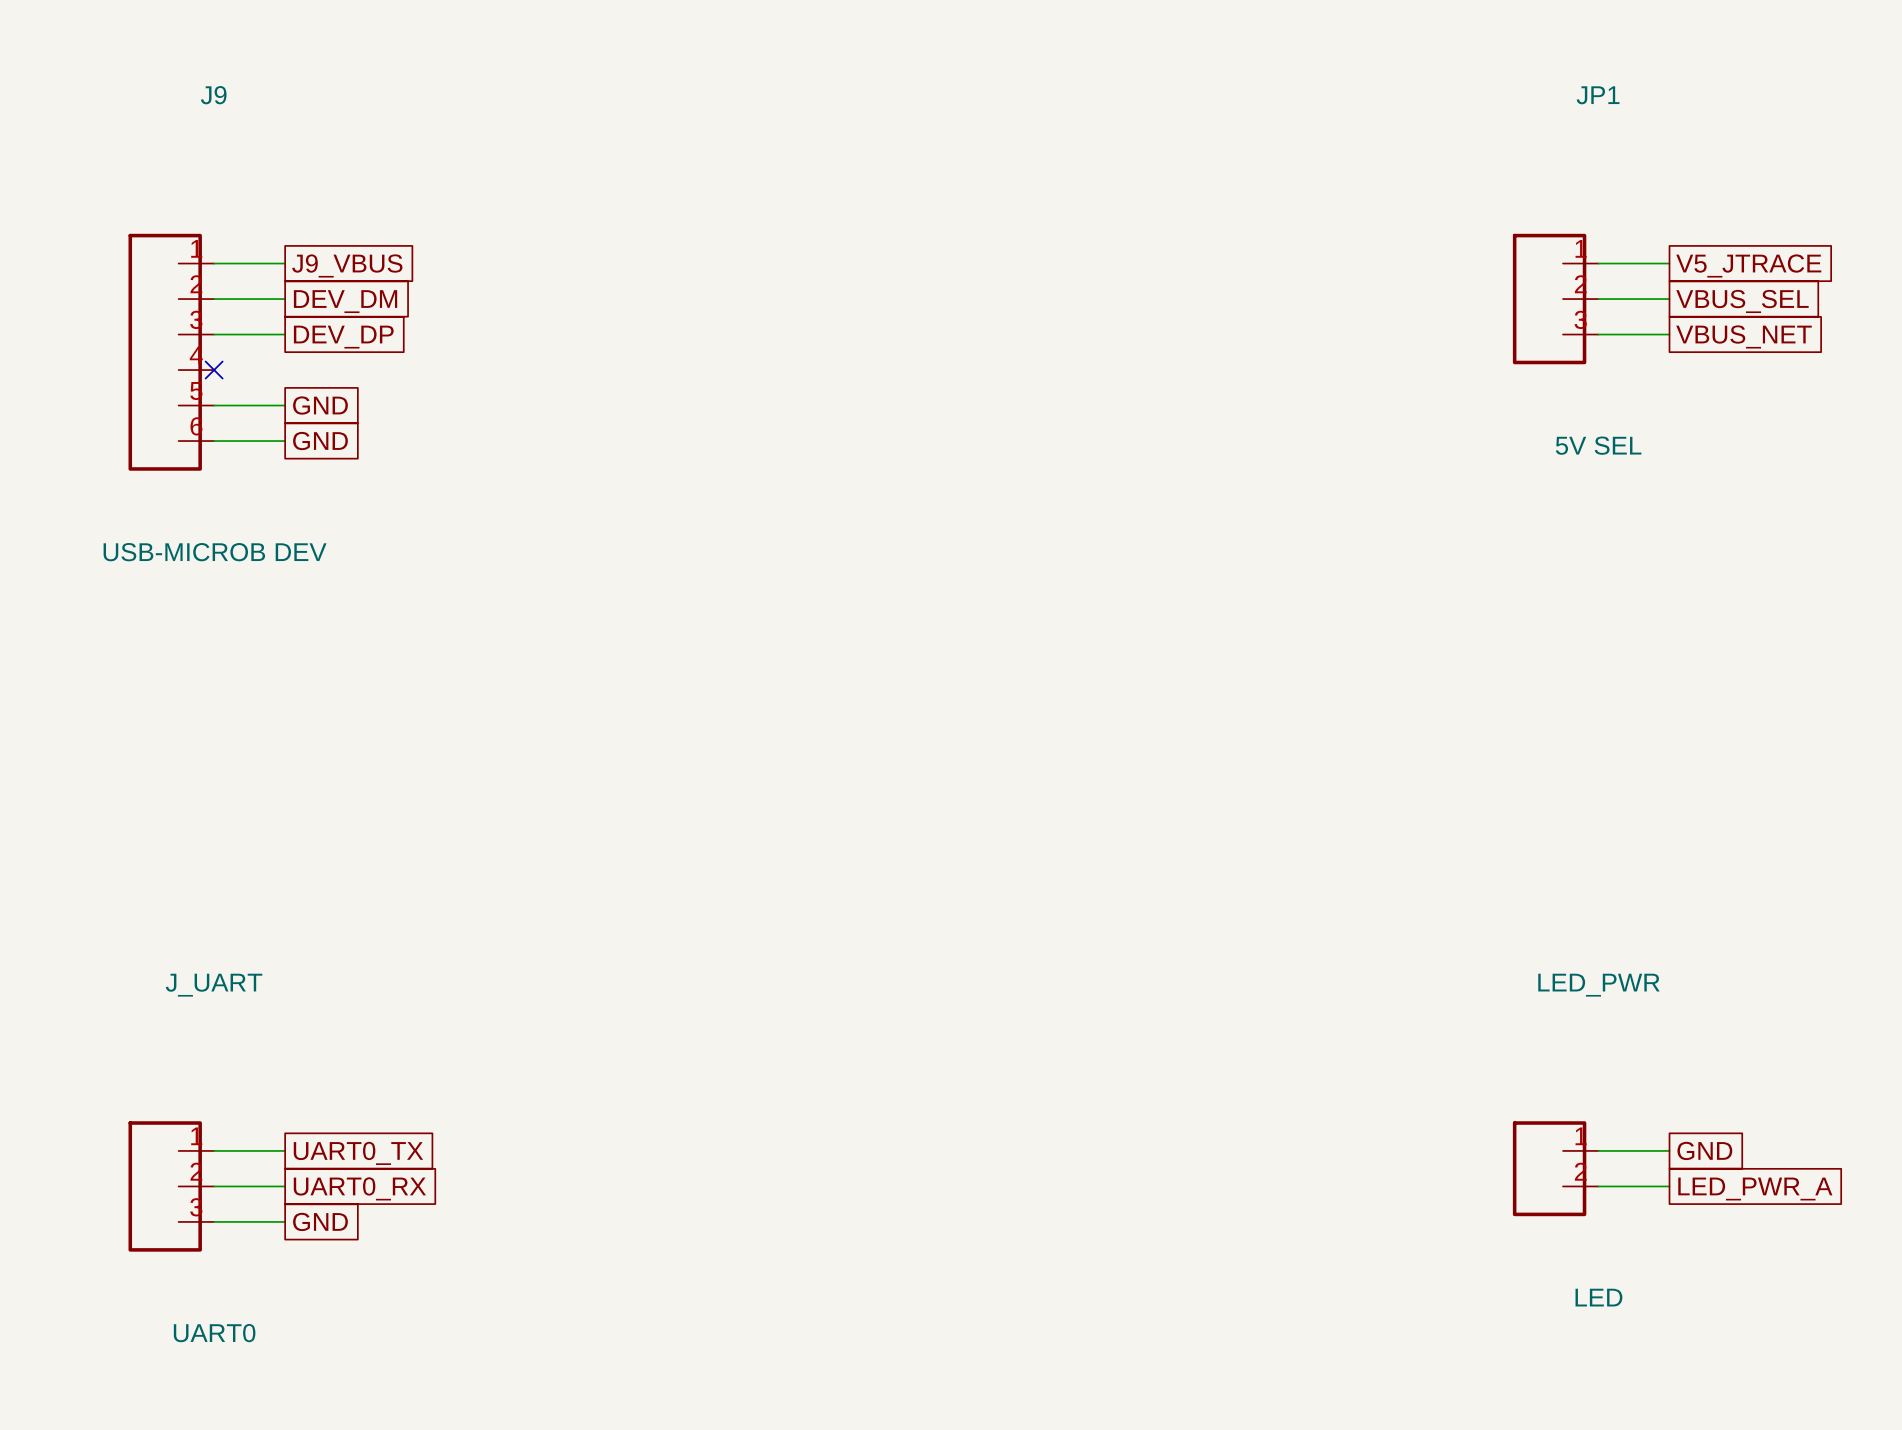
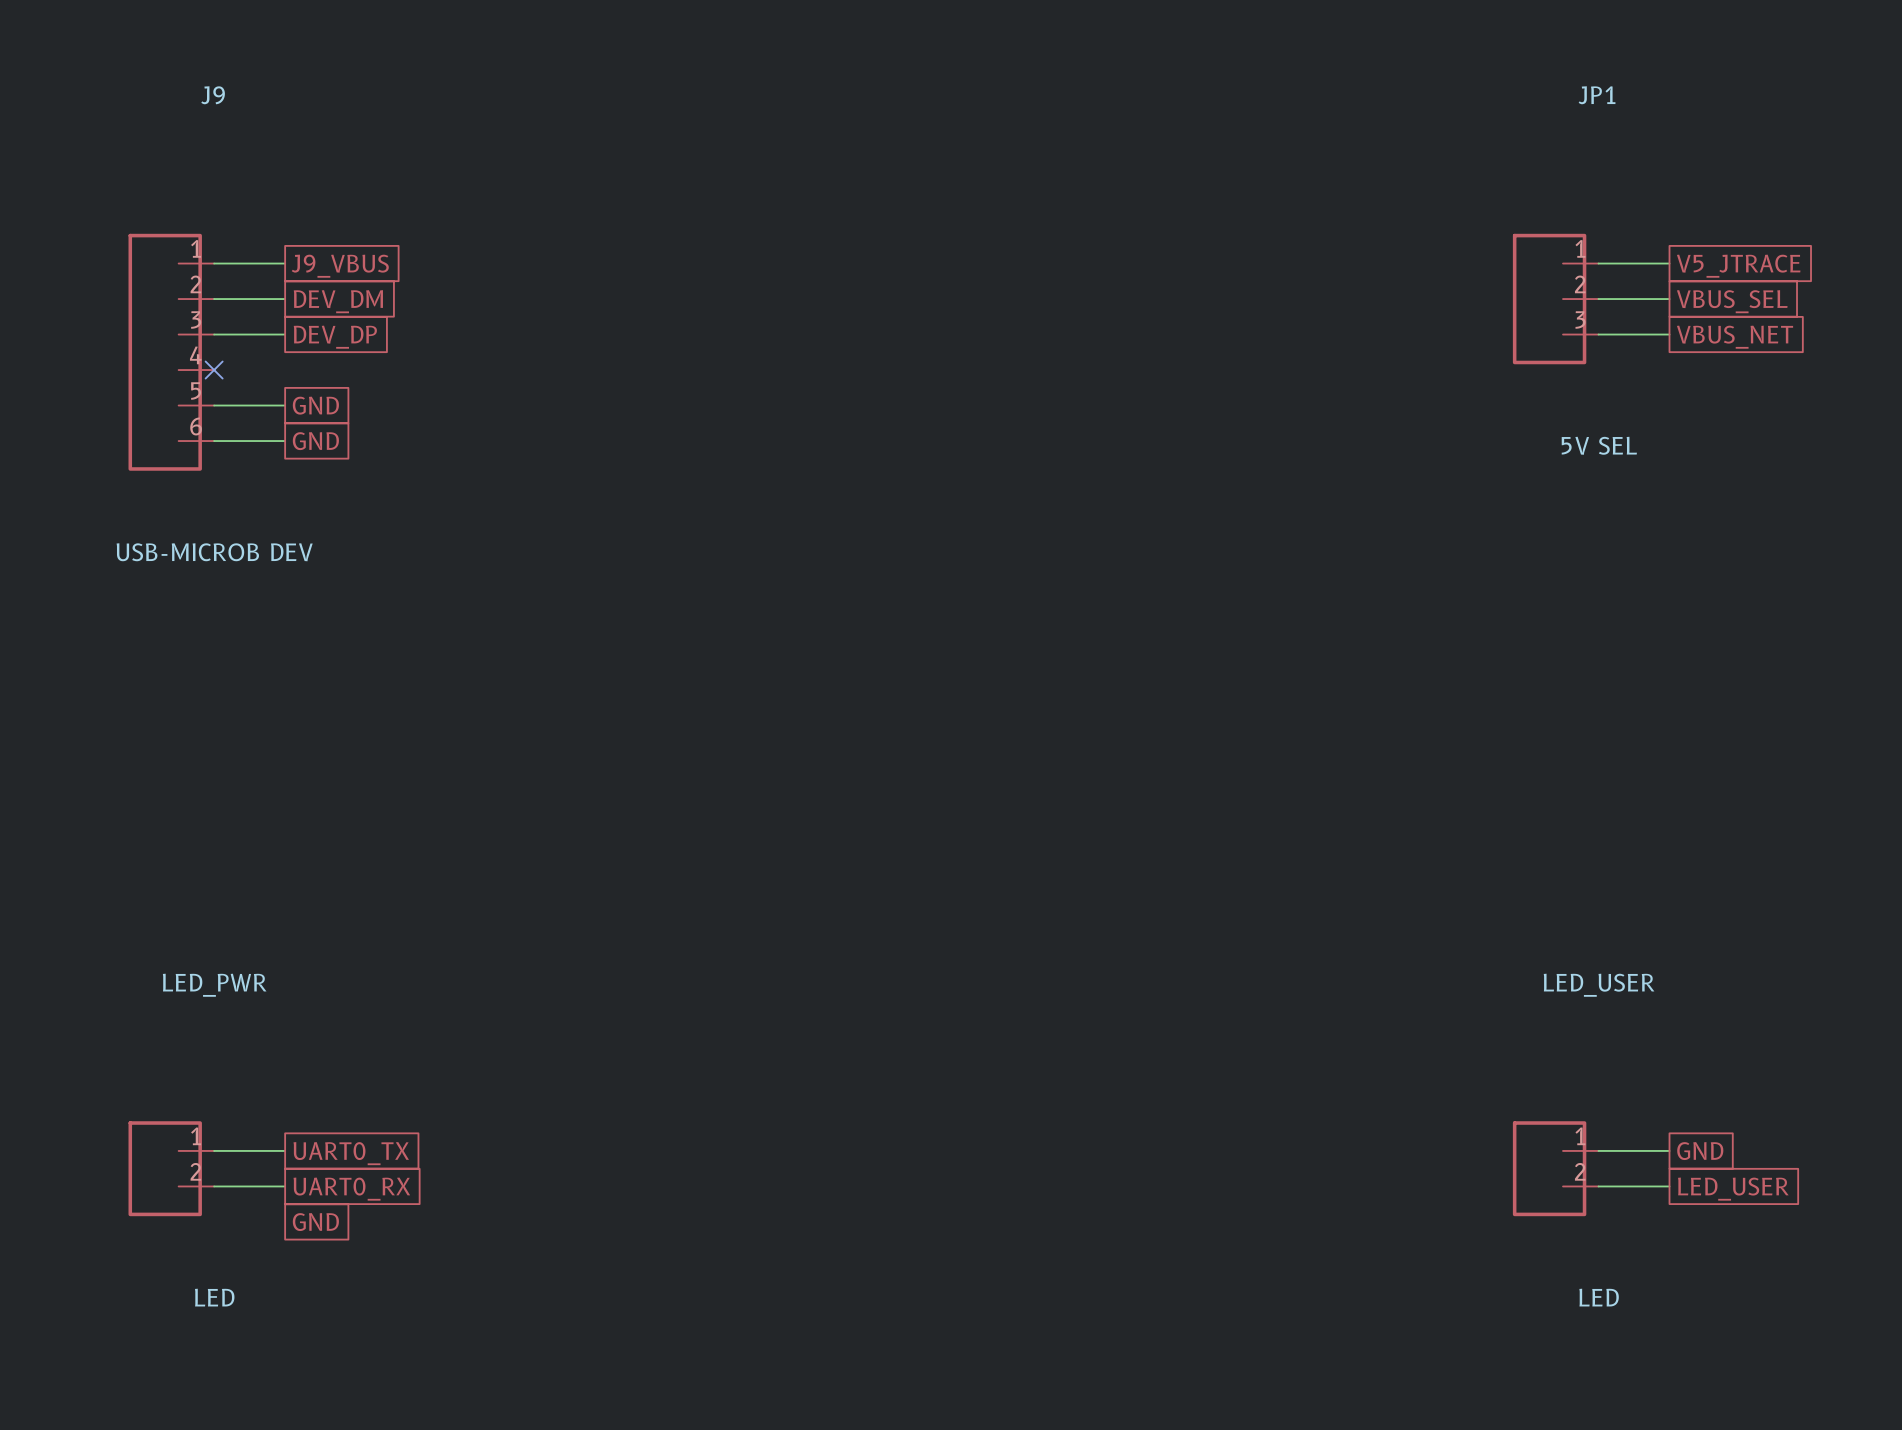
LED_PWR name: LED_PWR (1598, 985) -> LED_USER (1599, 985)
LED_PWR: none -> LED (171, 1168)
J_UART: UART0 (171, 1186) -> none
global label: LED_PWR_A (1755, 1189) -> LED_USER (1733, 1189)
wire: (214, 1221) (285, 1221) -> none

